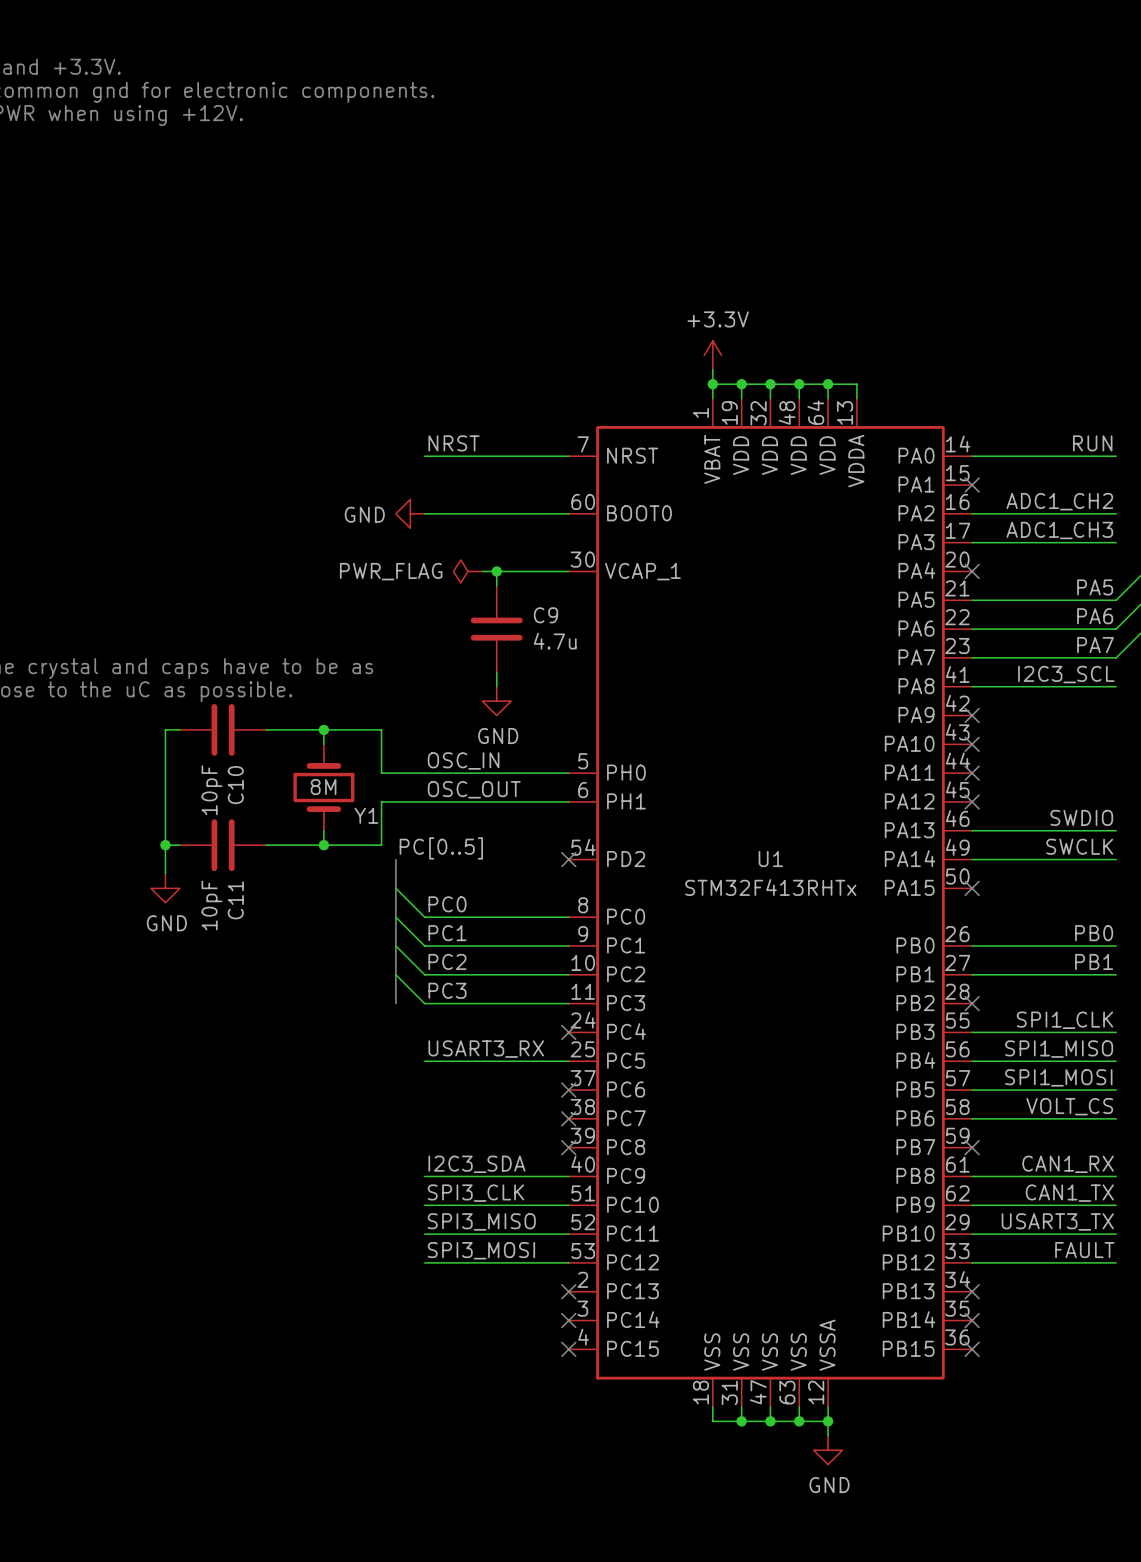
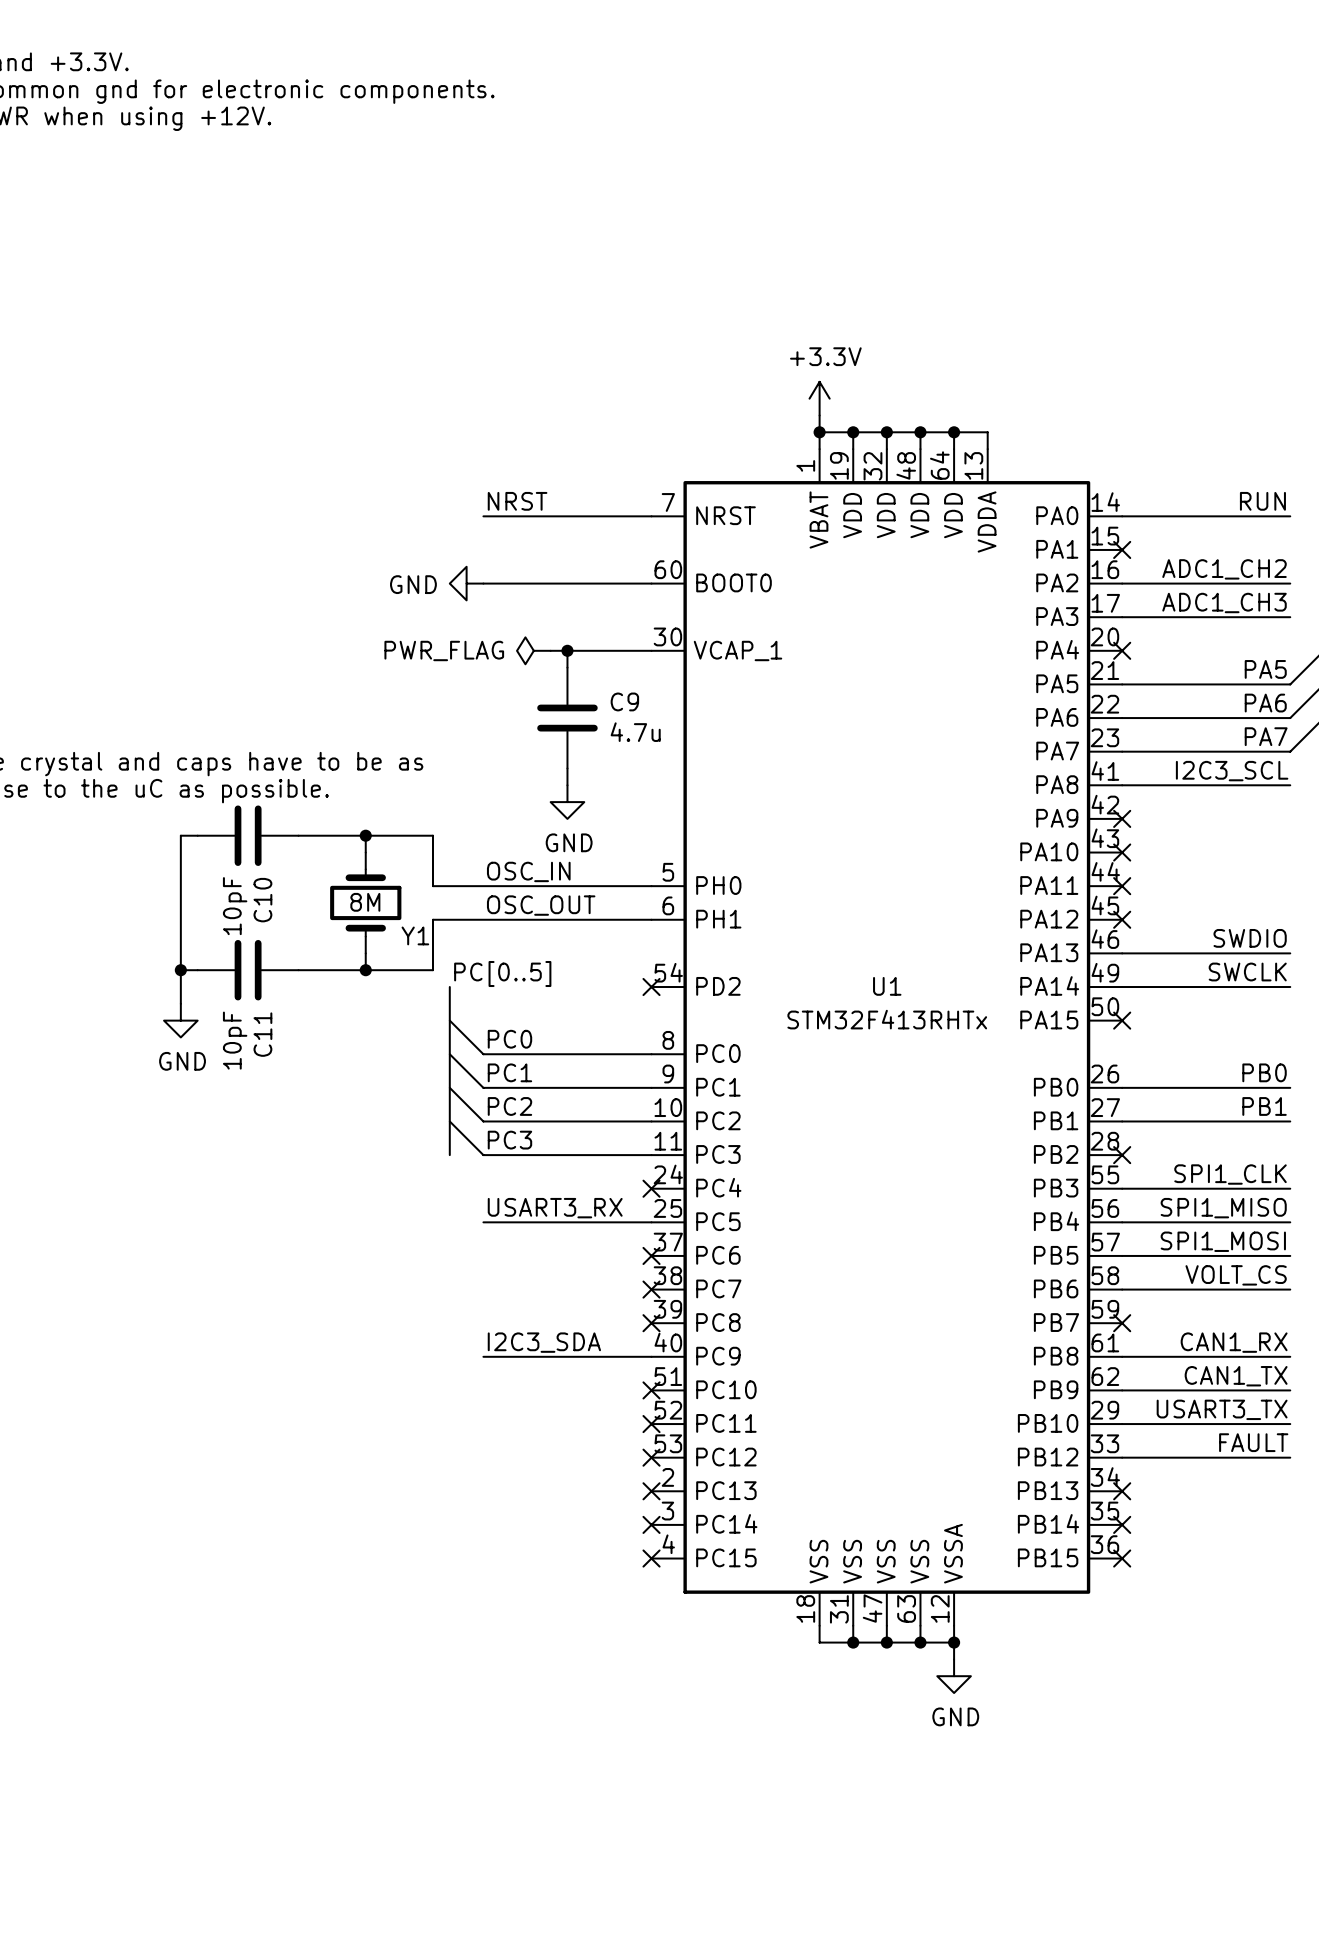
label: SPI3_CLK (475, 1193) -> none
wire: (424, 1205) (568, 1205) -> none
no-connect mark: none -> (651, 1390)
label: SPI3_MISO (481, 1221) -> none
wire: (424, 1234) (568, 1234) -> none
no-connect mark: none -> (651, 1424)
label: SPI3_MOSI (481, 1250) -> none
wire: (424, 1262) (568, 1262) -> none
no-connect mark: none -> (651, 1457)

